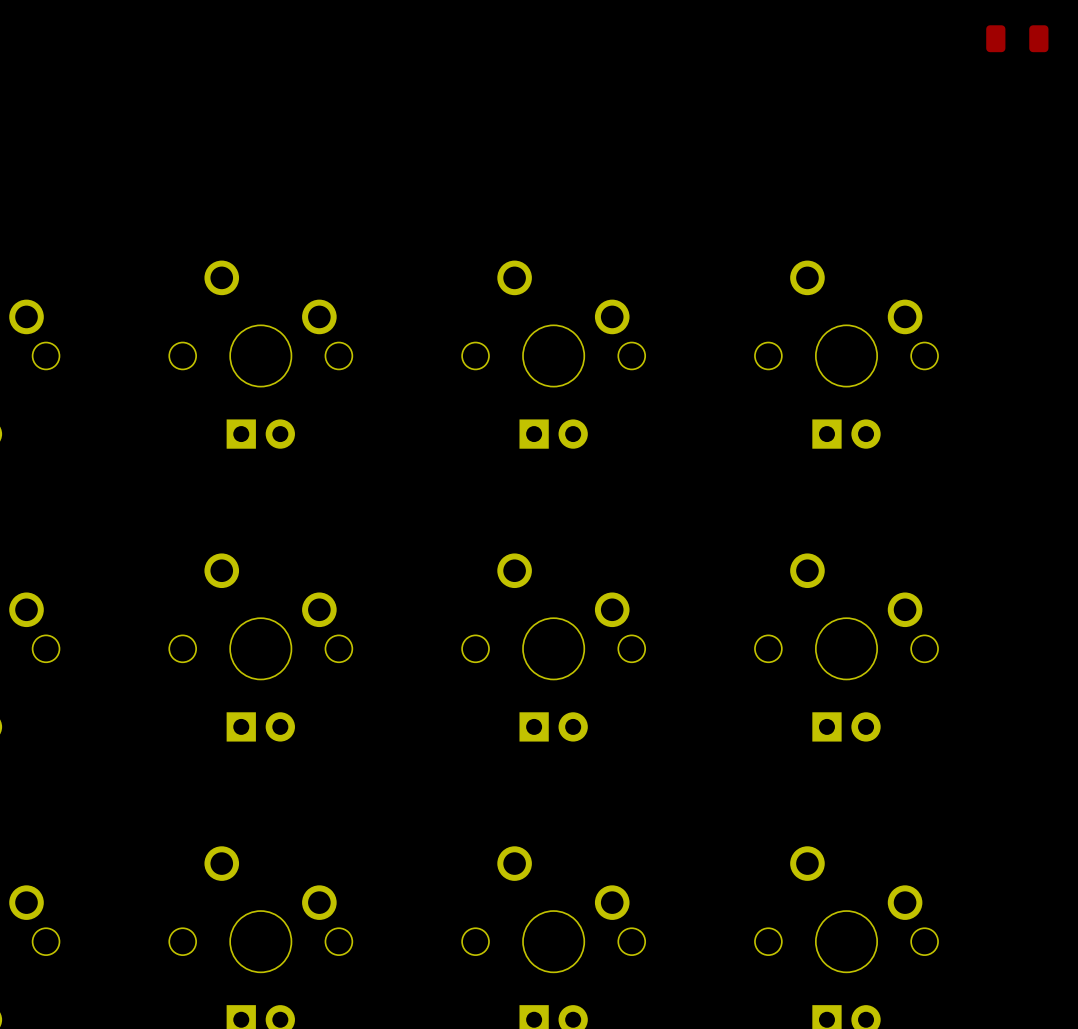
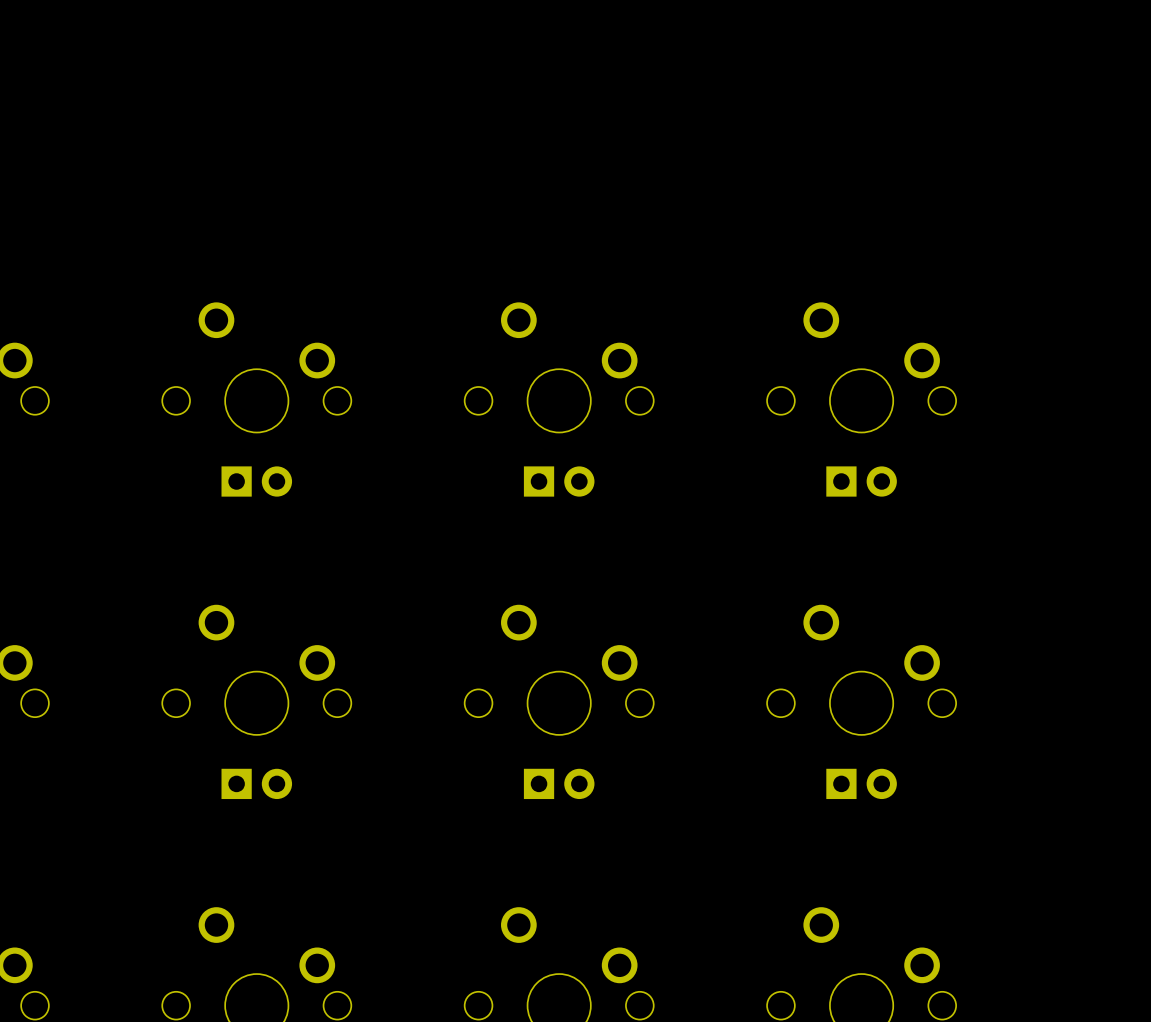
part: (1017, 38) -> none

